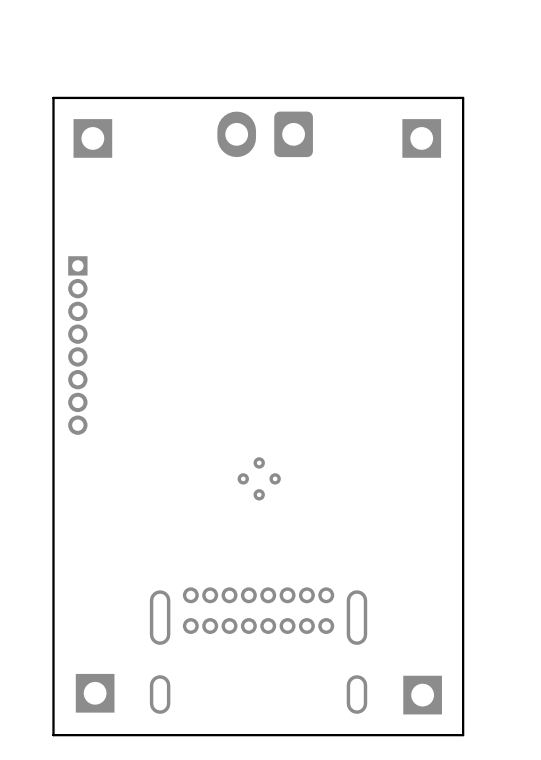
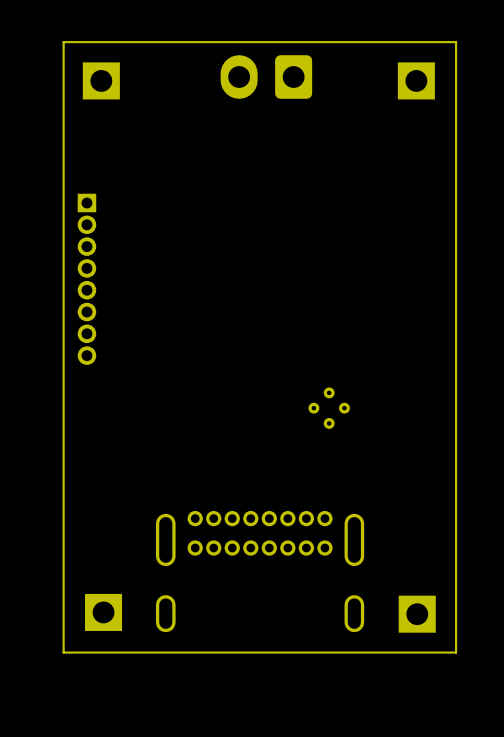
part position: (259, 478) -> (329, 408)

